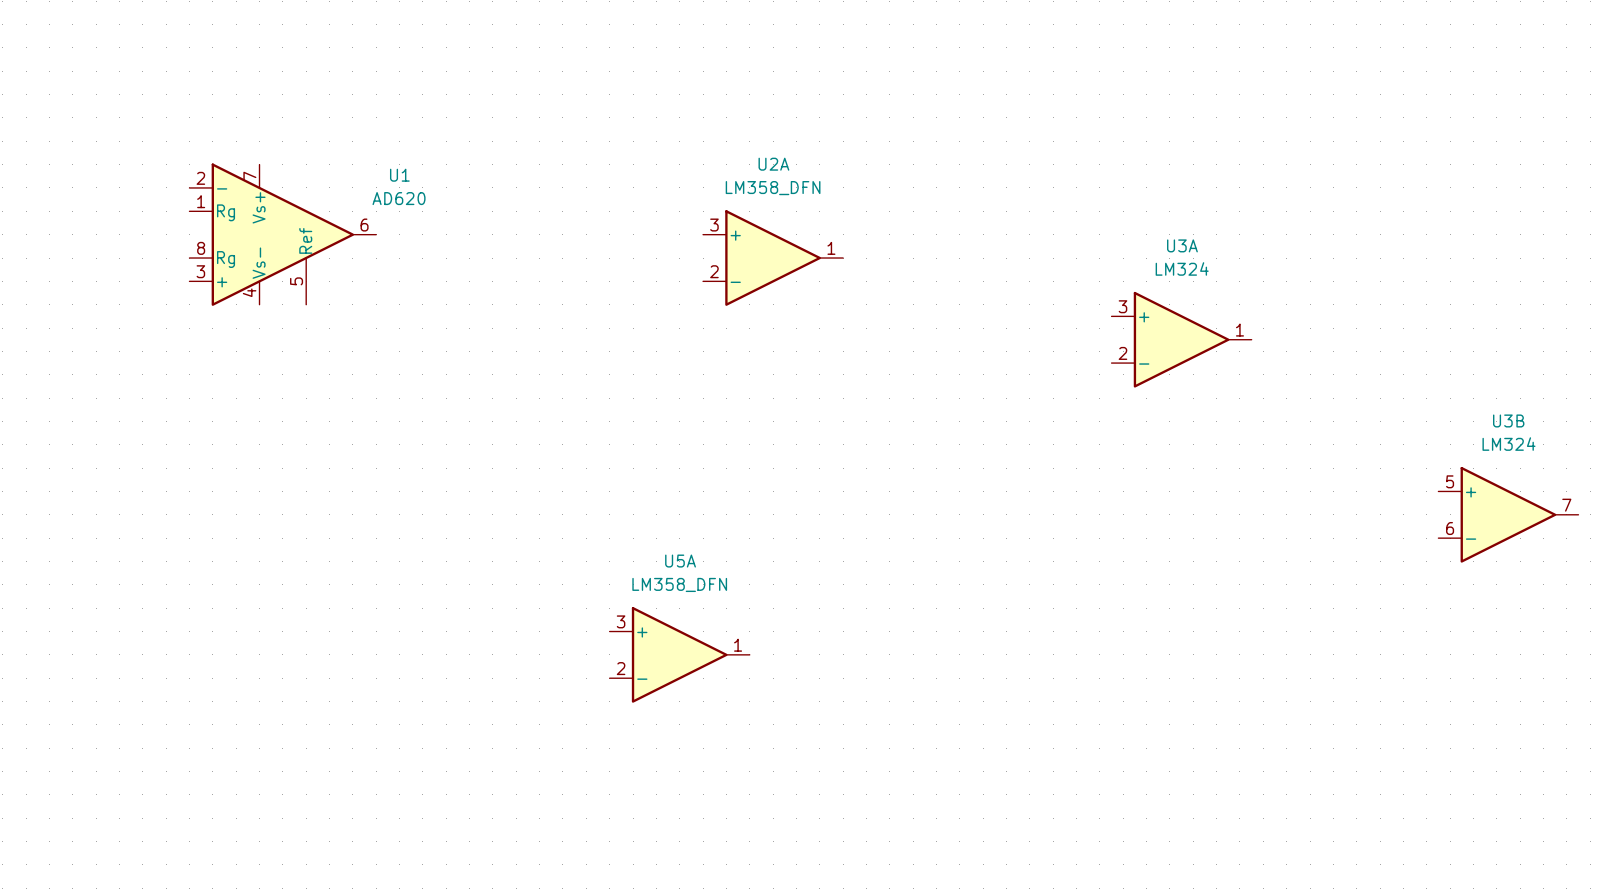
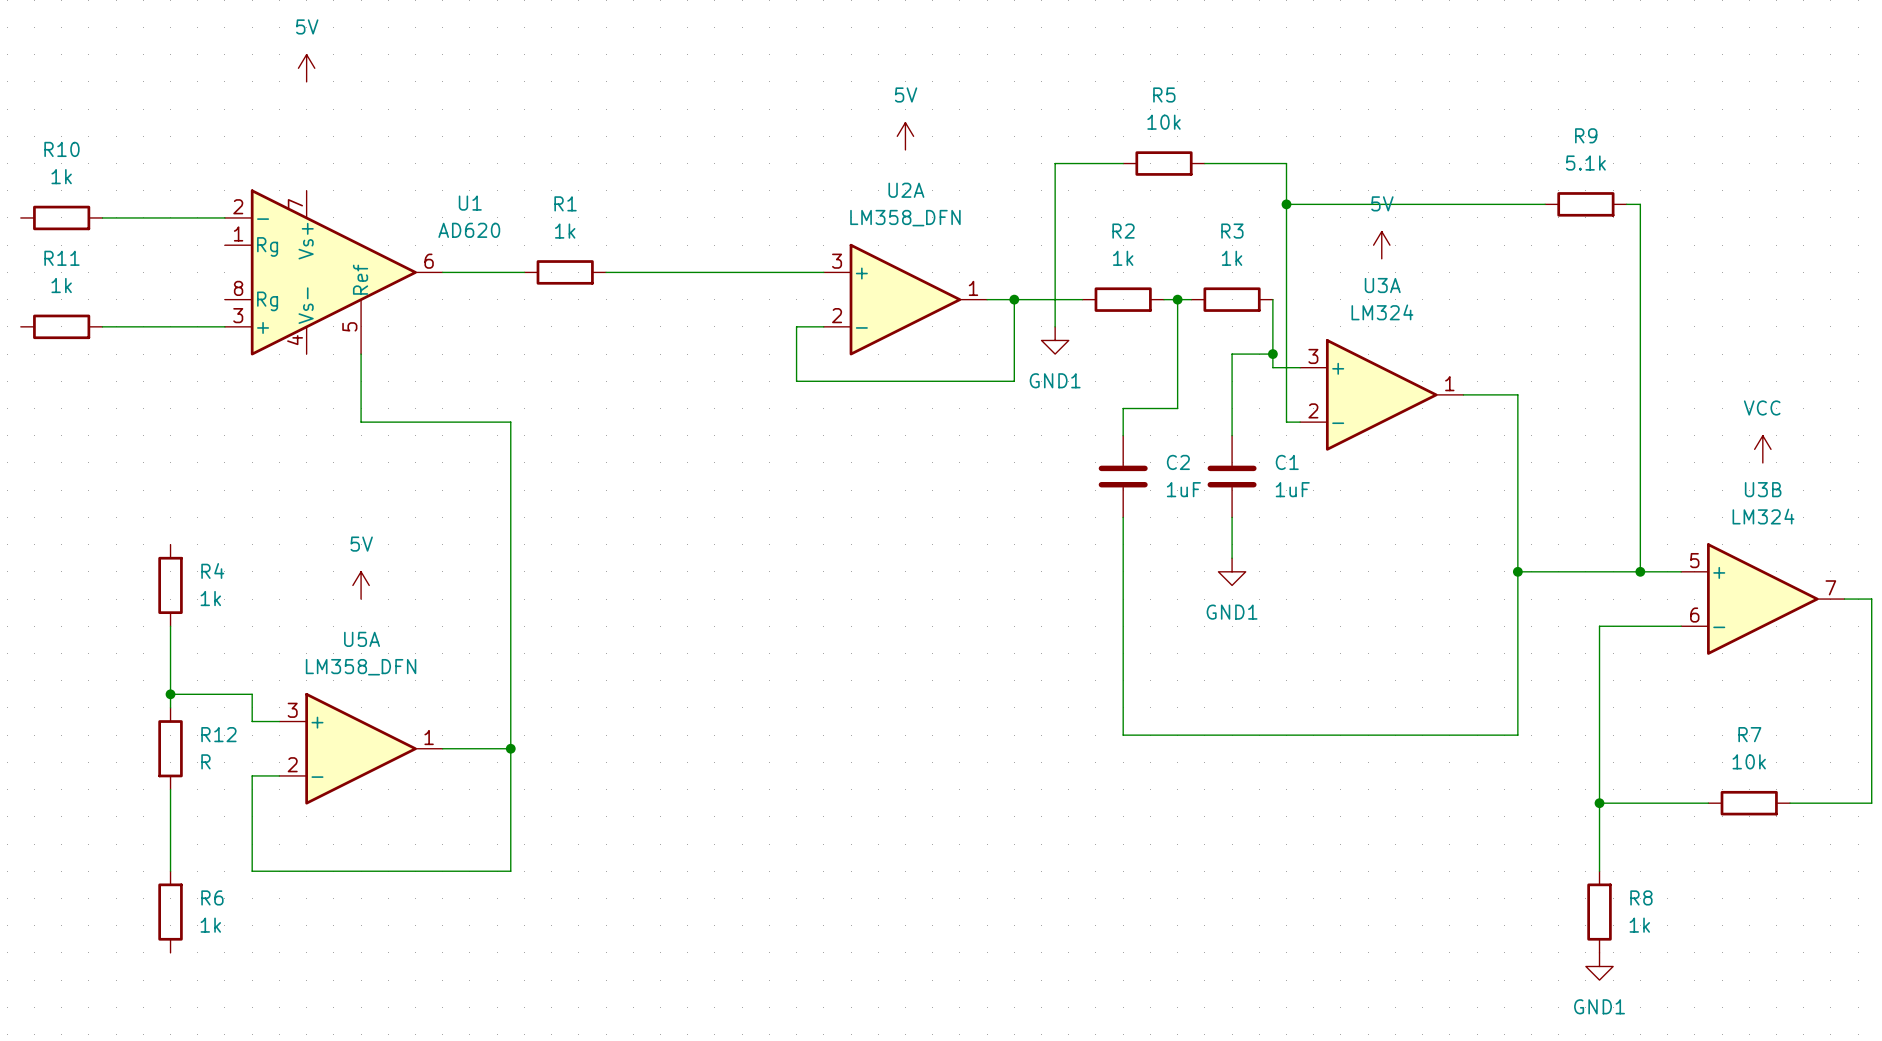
power symbol: none -> 5V (306, 68)
power symbol: none -> 5V (905, 136)
wire: none -> (1123, 163) (1055, 163) (1055, 326)
R5: none -> 10k (1164, 163)
wire: none -> (1204, 163) (1286, 163) (1286, 422) (1300, 422)
wire: none -> (1286, 204) (1545, 204)
junction: none -> (1286, 204)
R9: none -> 5.1k (1585, 204)
wire: none -> (1626, 204) (1640, 204) (1640, 571)
R10: none -> 1k (61, 217)
wire: none -> (102, 217) (224, 217)
power symbol: none -> 5V (1381, 245)
wire: none -> (442, 272) (524, 272)
R1: none -> 1k (565, 272)
wire: none -> (606, 272) (823, 272)
wire: none -> (987, 299) (1082, 299)
wire: none -> (1014, 299) (1014, 381) (796, 381) (796, 326) (823, 326)
junction: none -> (1014, 299)
R2: none -> 1k (1123, 299)
wire: none -> (1164, 299) (1191, 299)
wire: none -> (1177, 299) (1177, 408) (1123, 408) (1123, 435)
junction: none -> (1177, 299)
R3: none -> 1k (1232, 299)
wire: none -> (1272, 299) (1272, 367) (1300, 367)
R11: none -> 1k (61, 326)
wire: none -> (102, 326) (224, 326)
power symbol: none -> GND1 (1055, 340)
wire: none -> (361, 354) (361, 422) (510, 422) (510, 871) (252, 871) (252, 775) (279, 775)
wire: none -> (1272, 354) (1232, 354) (1232, 435)
junction: none -> (1272, 354)
wire: none -> (1463, 394) (1517, 394) (1517, 735) (1123, 735) (1123, 517)
power symbol: none -> VCC (1762, 449)
C2: none -> 1uF (1123, 476)
C1: none -> 1uF (1232, 476)
wire: none -> (1232, 517) (1232, 558)
power symbol: none -> GND1 (1232, 571)
wire: none -> (1517, 571) (1681, 571)
junction: none -> (1517, 571)
junction: none -> (1640, 571)
R4: none -> 1k (170, 585)
power symbol: none -> 5V (361, 585)
wire: none -> (1844, 599) (1871, 599) (1871, 803) (1790, 803)
wire: none -> (170, 626) (170, 707)
wire: none -> (1681, 626) (1599, 626) (1599, 871)
wire: none -> (170, 694) (252, 694) (252, 721) (279, 721)
junction: none -> (170, 694)
R12: none -> R (170, 748)
wire: none -> (442, 748) (510, 748)
junction: none -> (510, 748)
U5A position: (679, 654) -> (361, 748)
wire: none -> (170, 789) (170, 871)
wire: none -> (1599, 803) (1708, 803)
junction: none -> (1599, 803)
R7: none -> 10k (1749, 803)
R6: none -> 1k (170, 912)
R8: none -> 1k (1599, 912)
power symbol: none -> GND1 (1599, 966)

